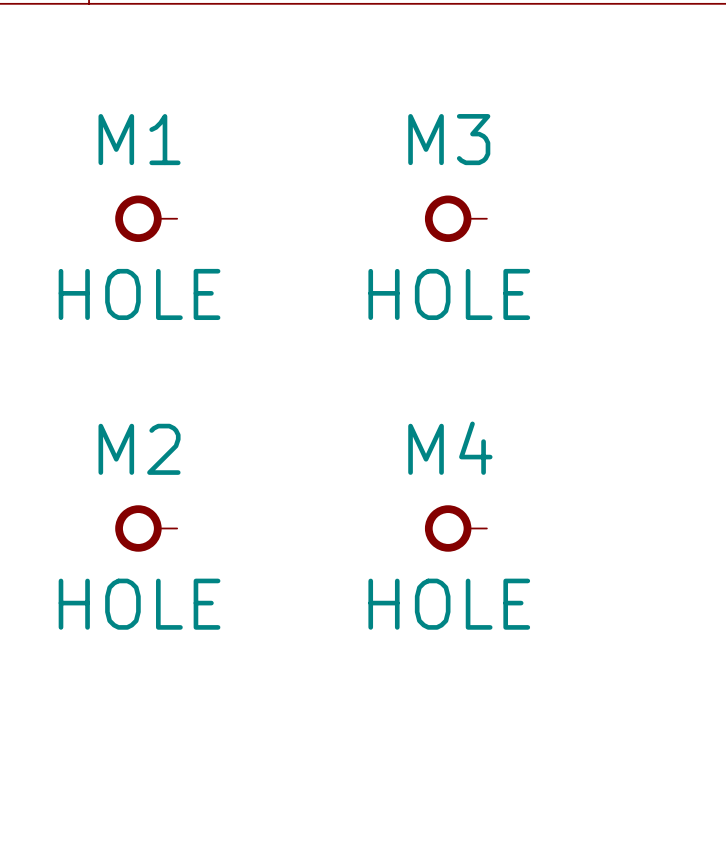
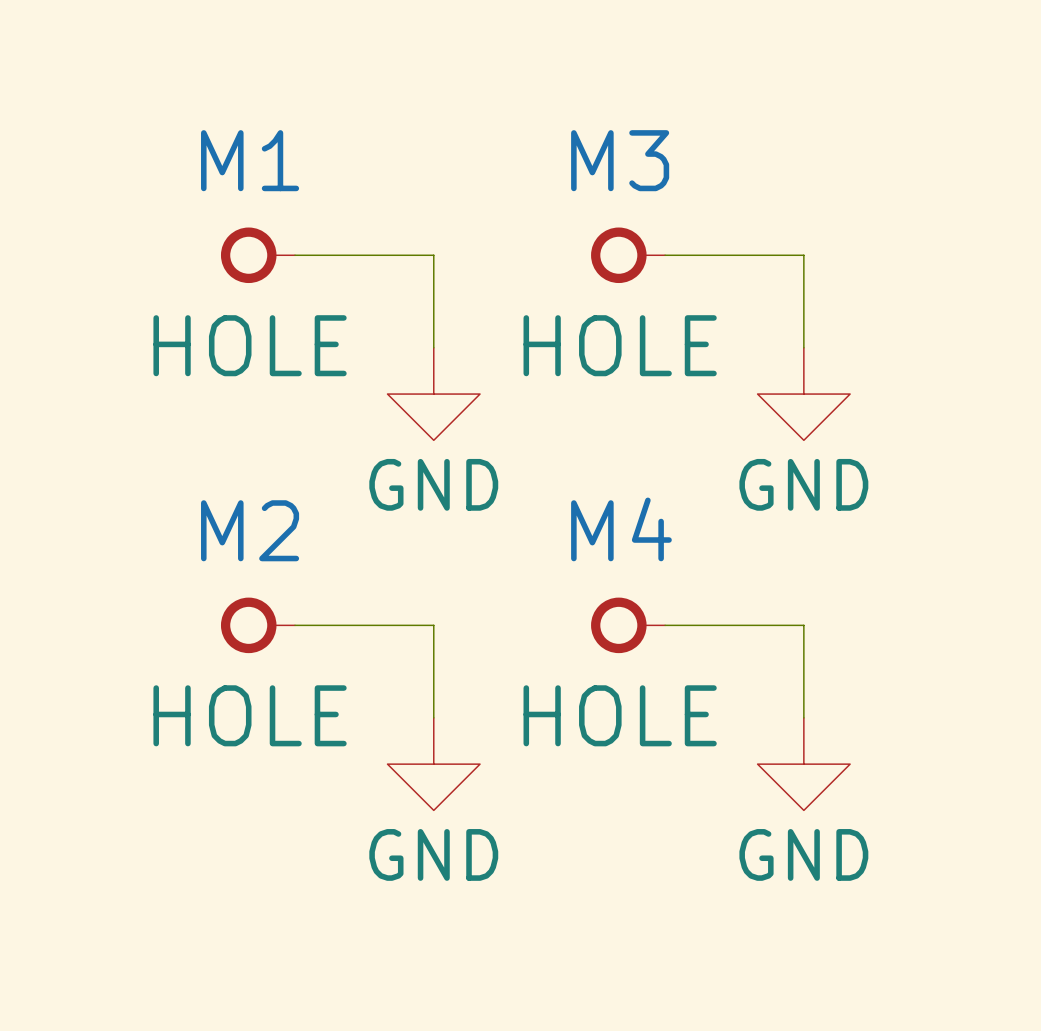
wire: none -> (294, 255) (433, 255) (433, 347)
wire: none -> (665, 255) (803, 255) (803, 347)
power symbol: none -> GND (433, 394)
power symbol: none -> GND (803, 394)
wire: none -> (294, 625) (433, 625) (433, 717)
wire: none -> (665, 625) (803, 625) (803, 717)
power symbol: none -> GND (433, 764)
power symbol: none -> GND (803, 764)

